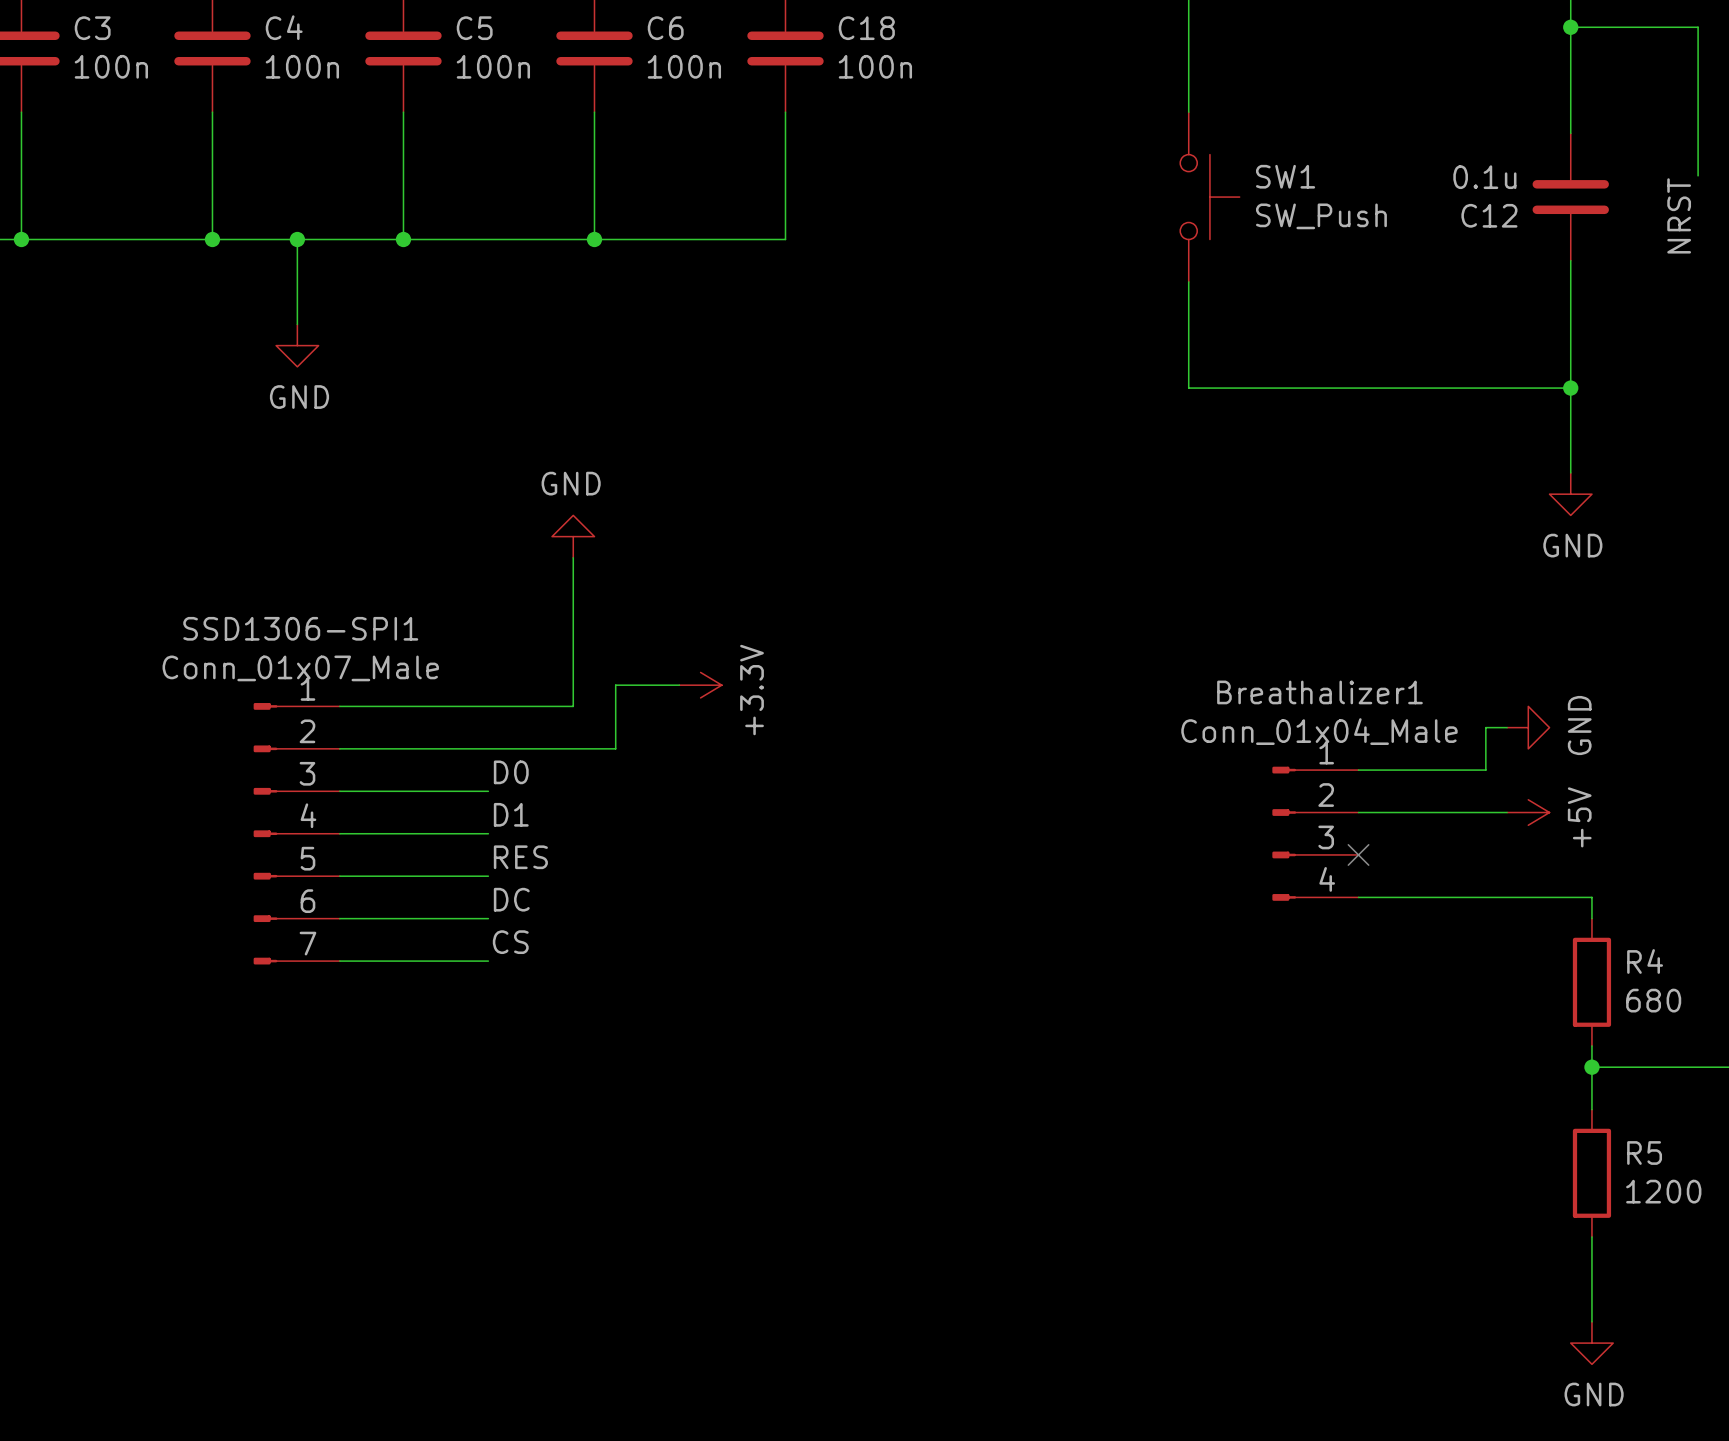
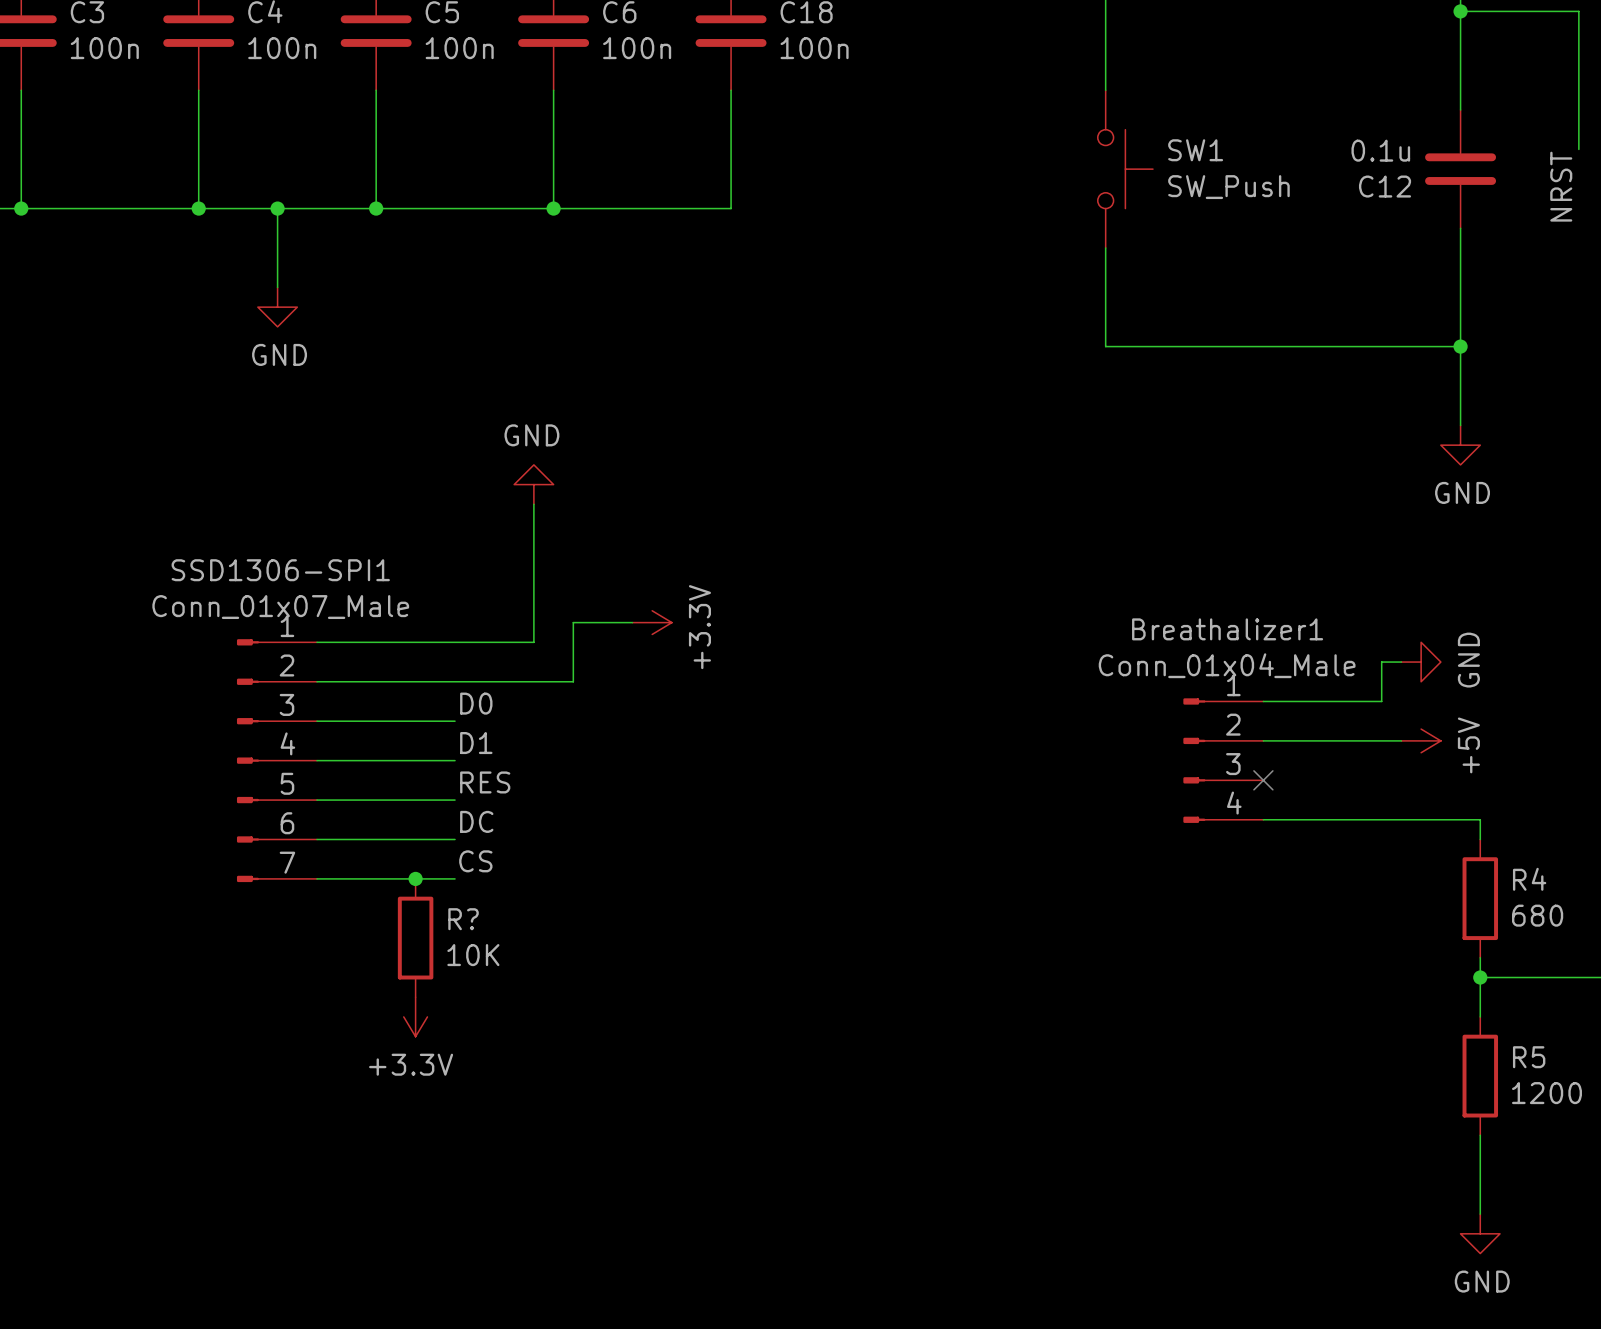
junction: none -> (415, 878)
R?: none -> 10K (415, 938)
power symbol: none -> +3.3V (415, 1016)

